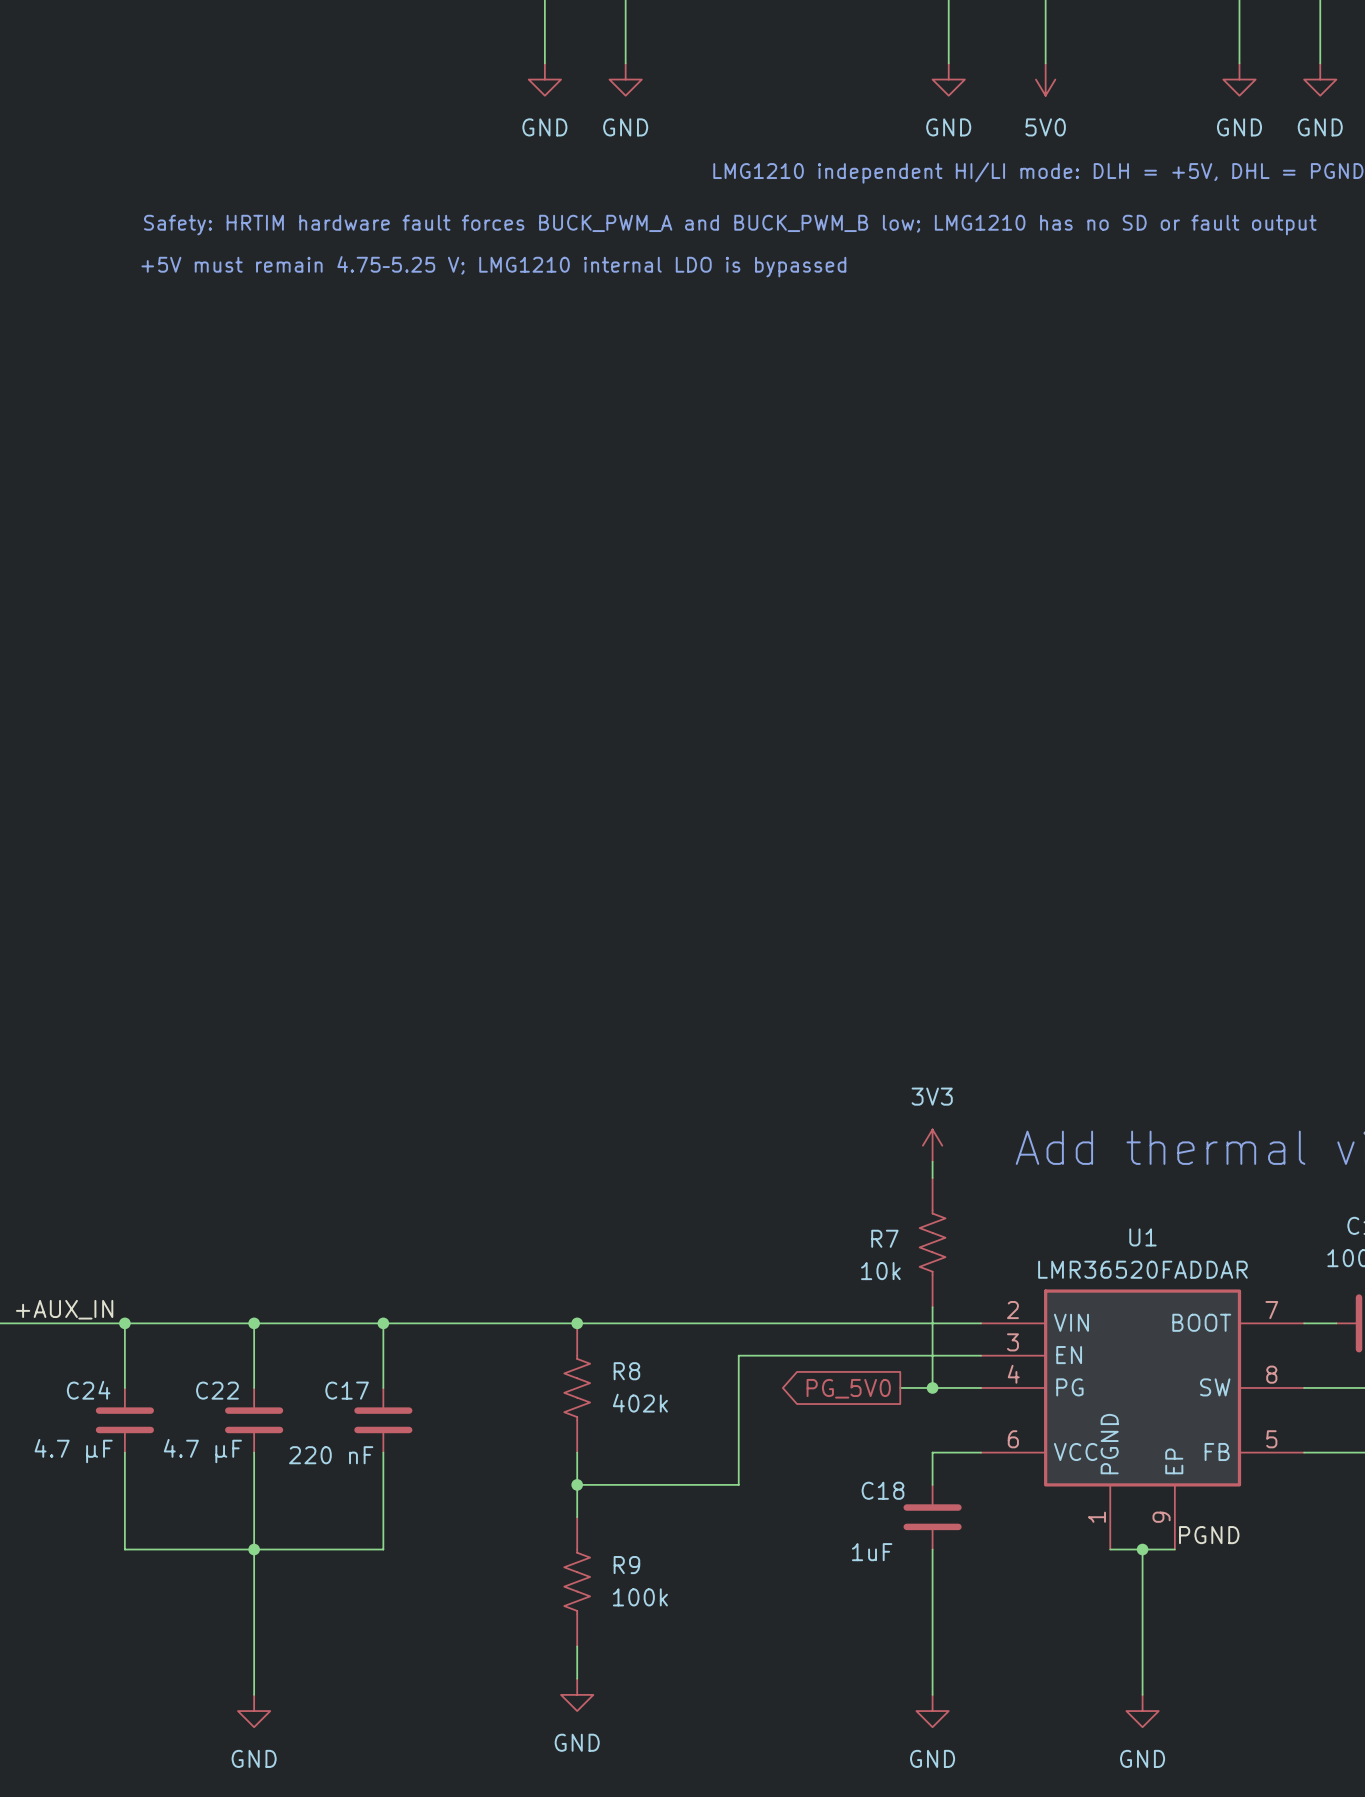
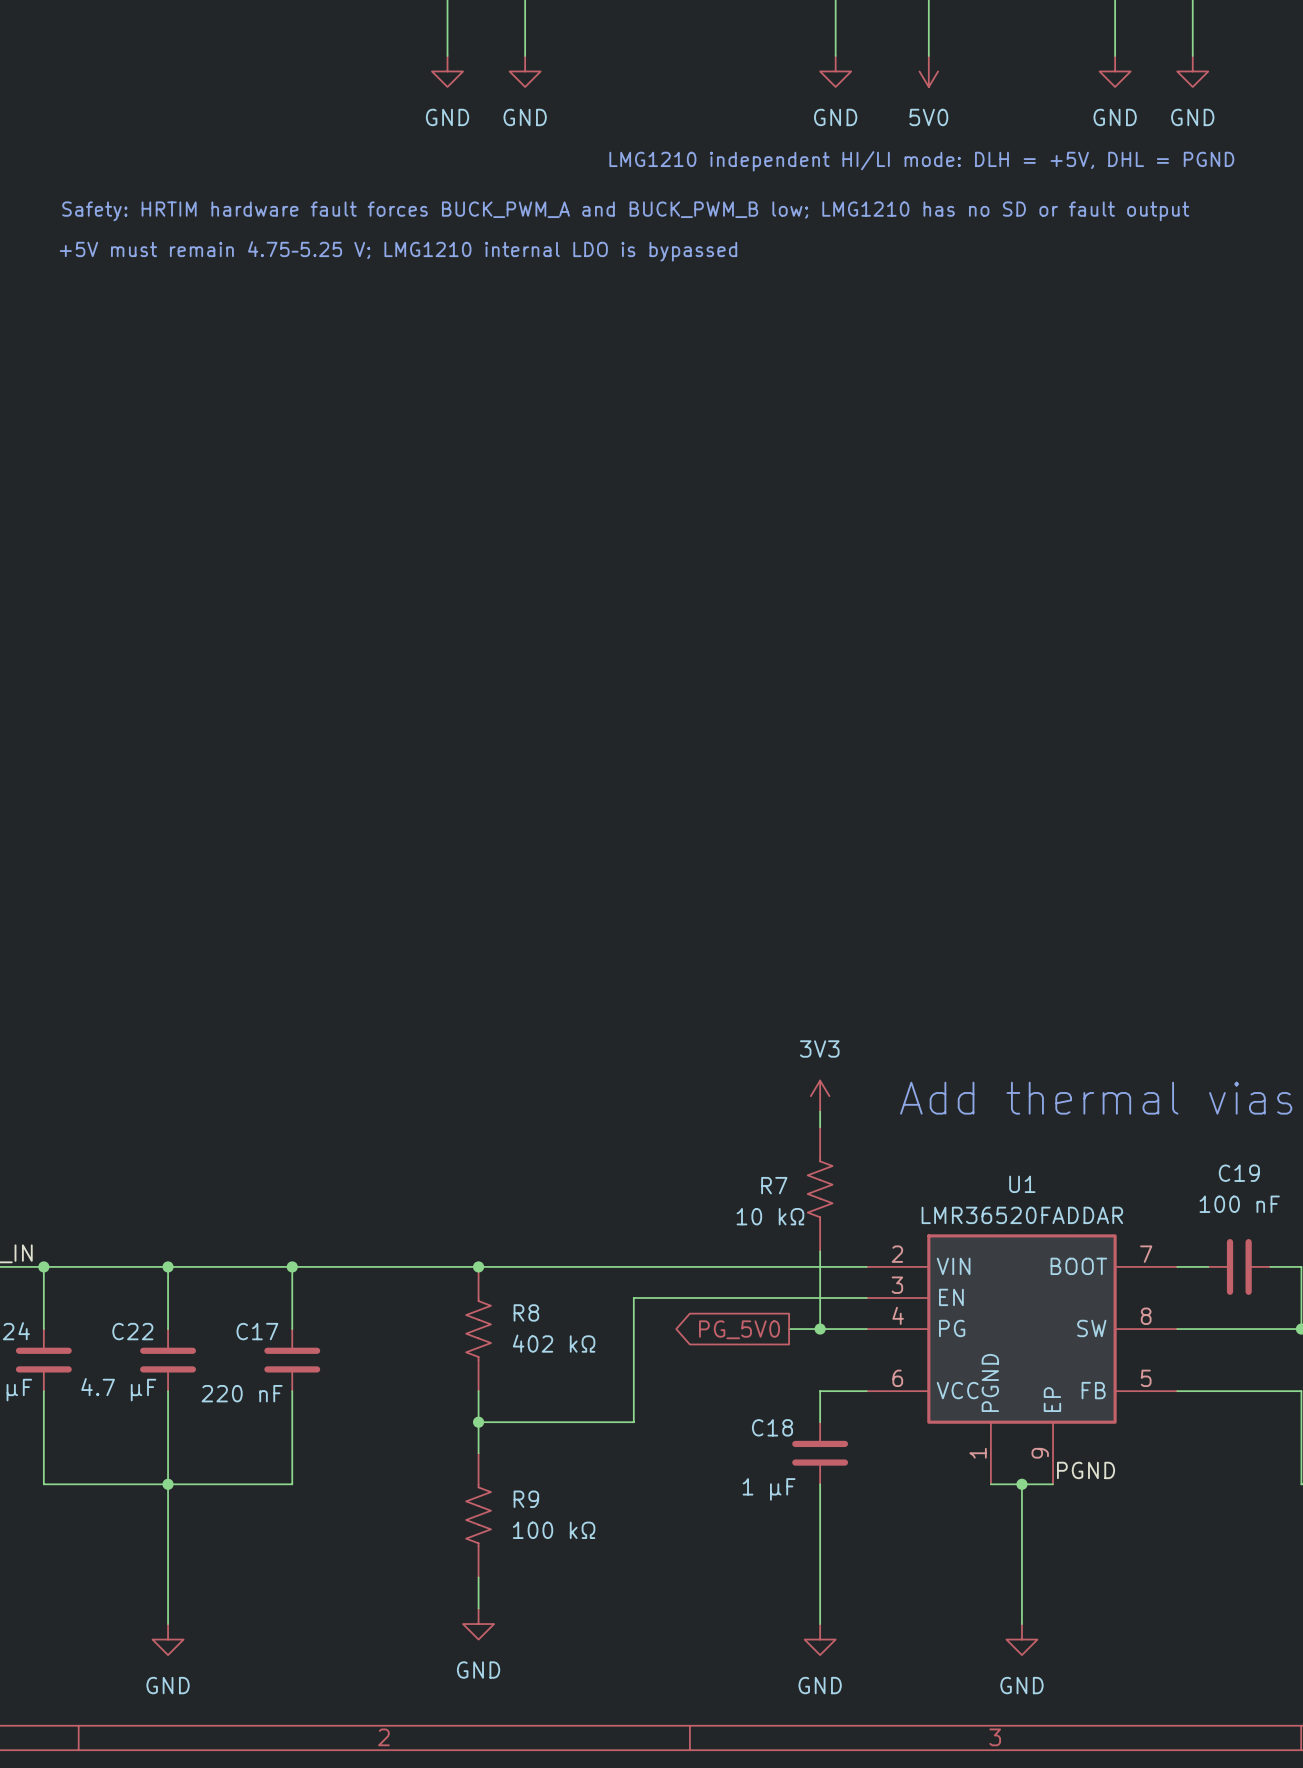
R7 value: 10k (880, 1271) -> 10 kΩ (770, 1216)
R8 value: 402k (640, 1403) -> 402 kΩ (554, 1343)
C18 value: 1uF (872, 1552) -> 1 µF (769, 1489)
R9 value: 100k (640, 1597) -> 100 kΩ (554, 1530)

